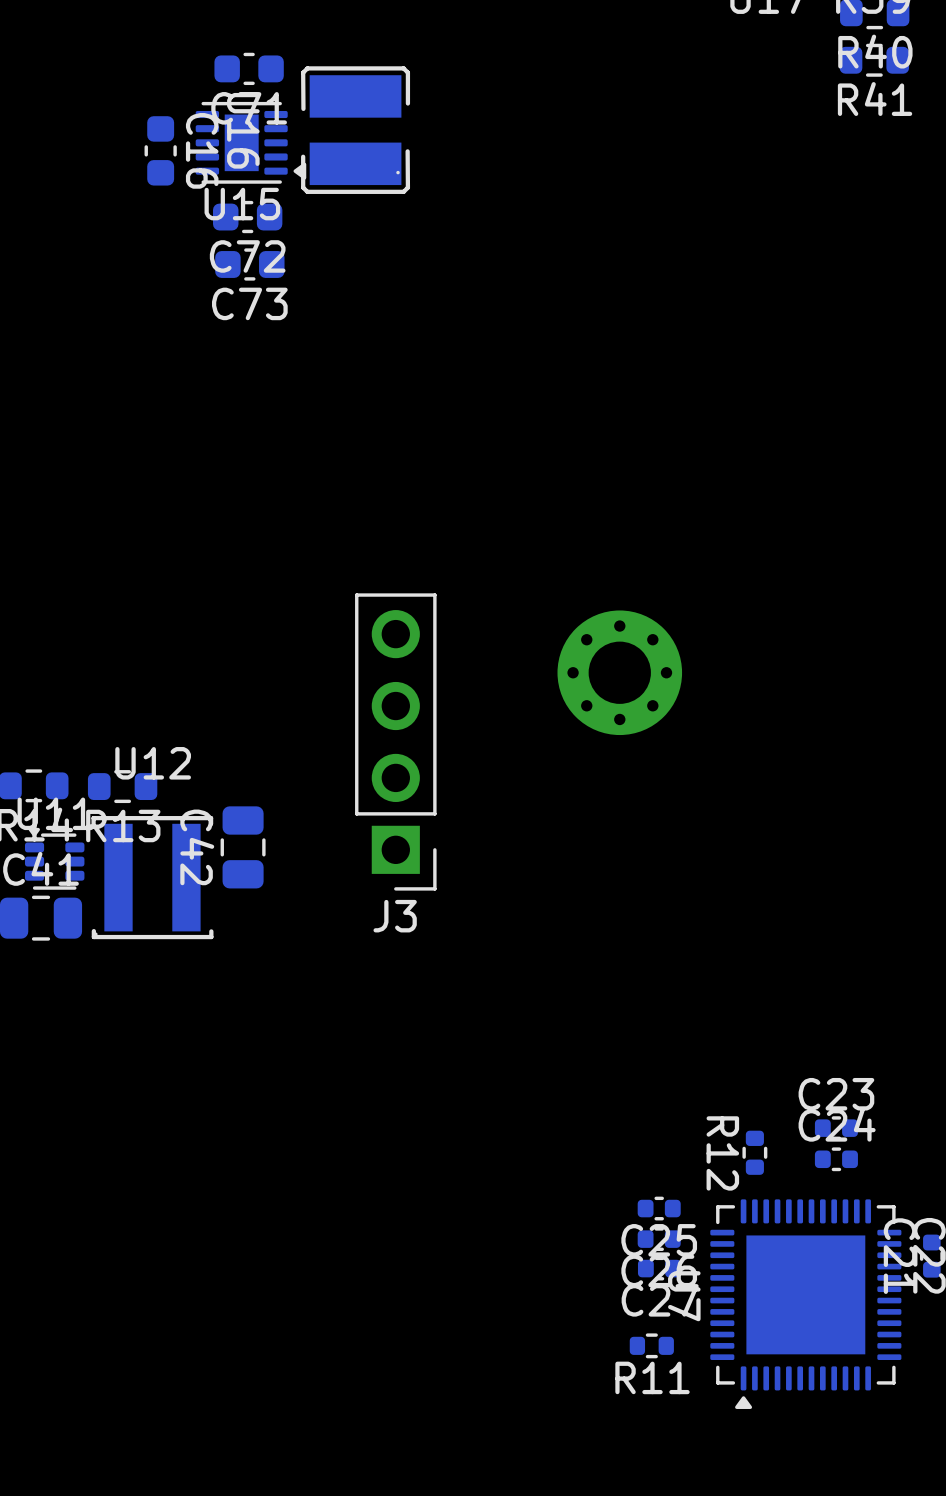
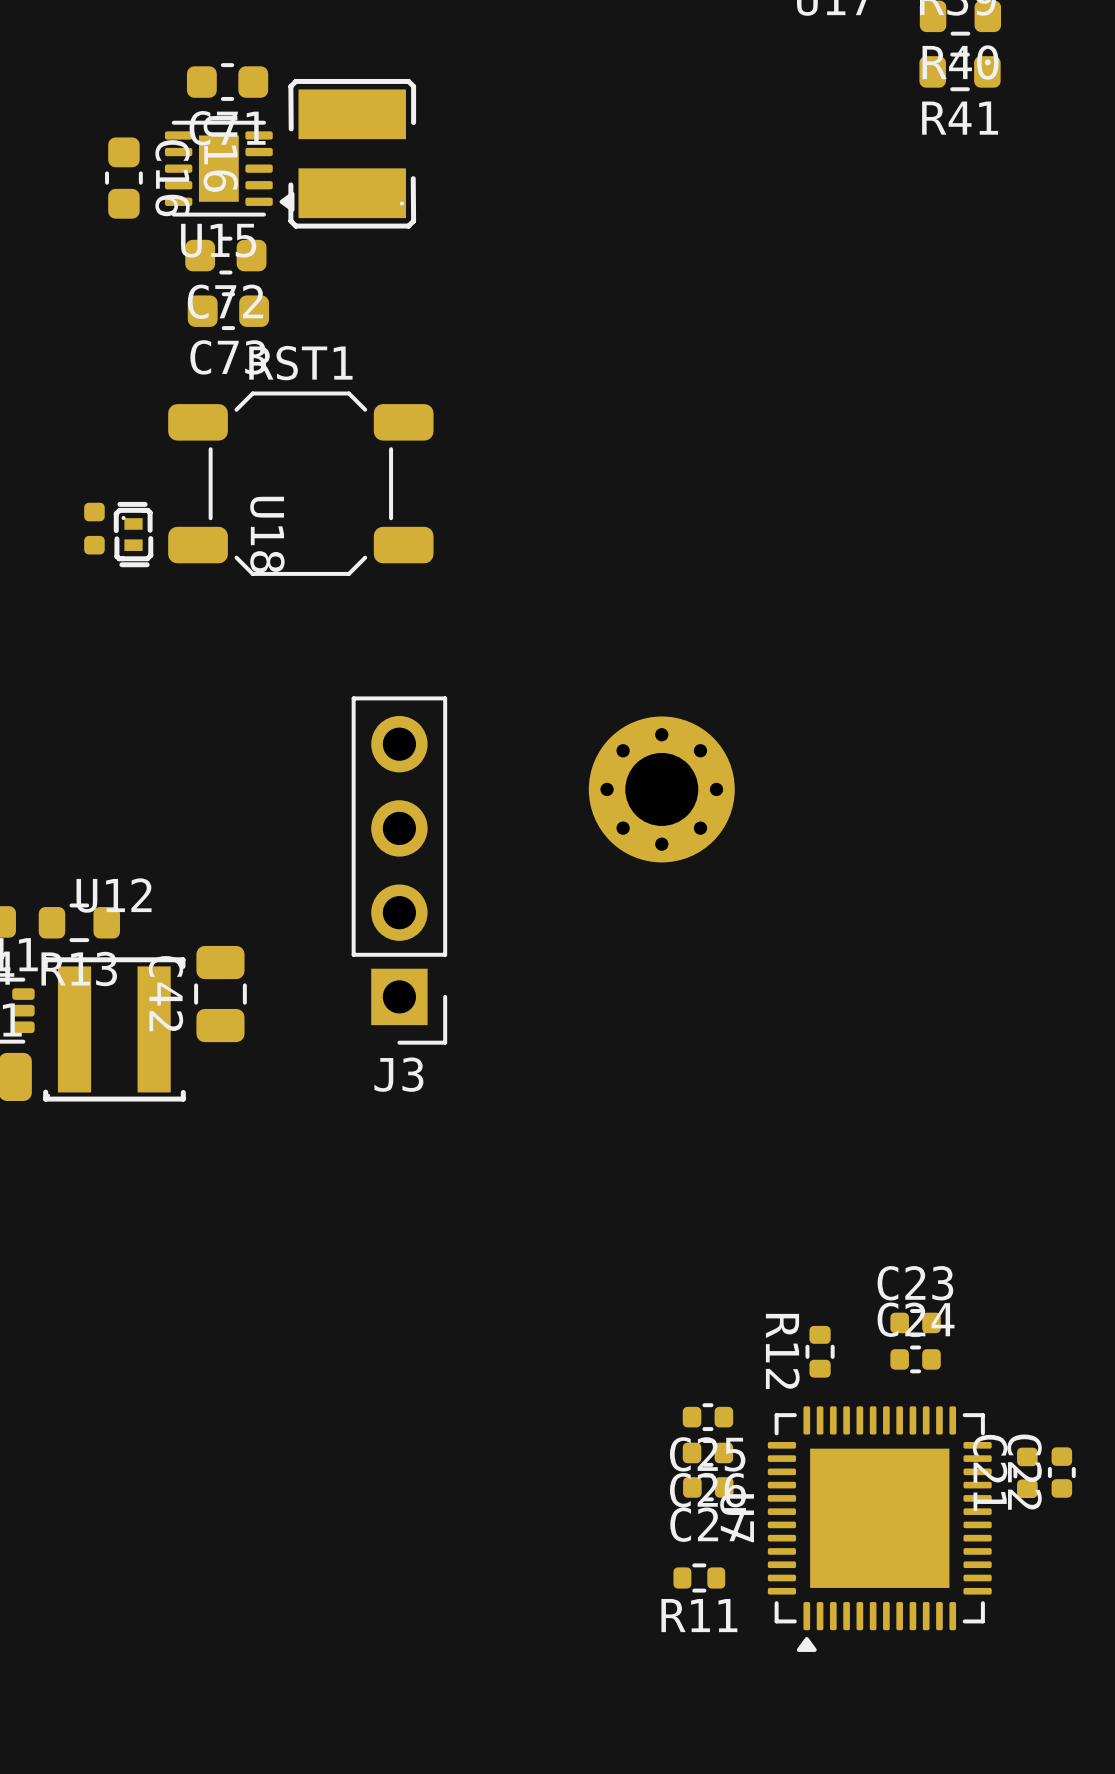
RST1: none -> (300, 483)
part: none -> (94, 528)
U18: none -> (133, 534)

